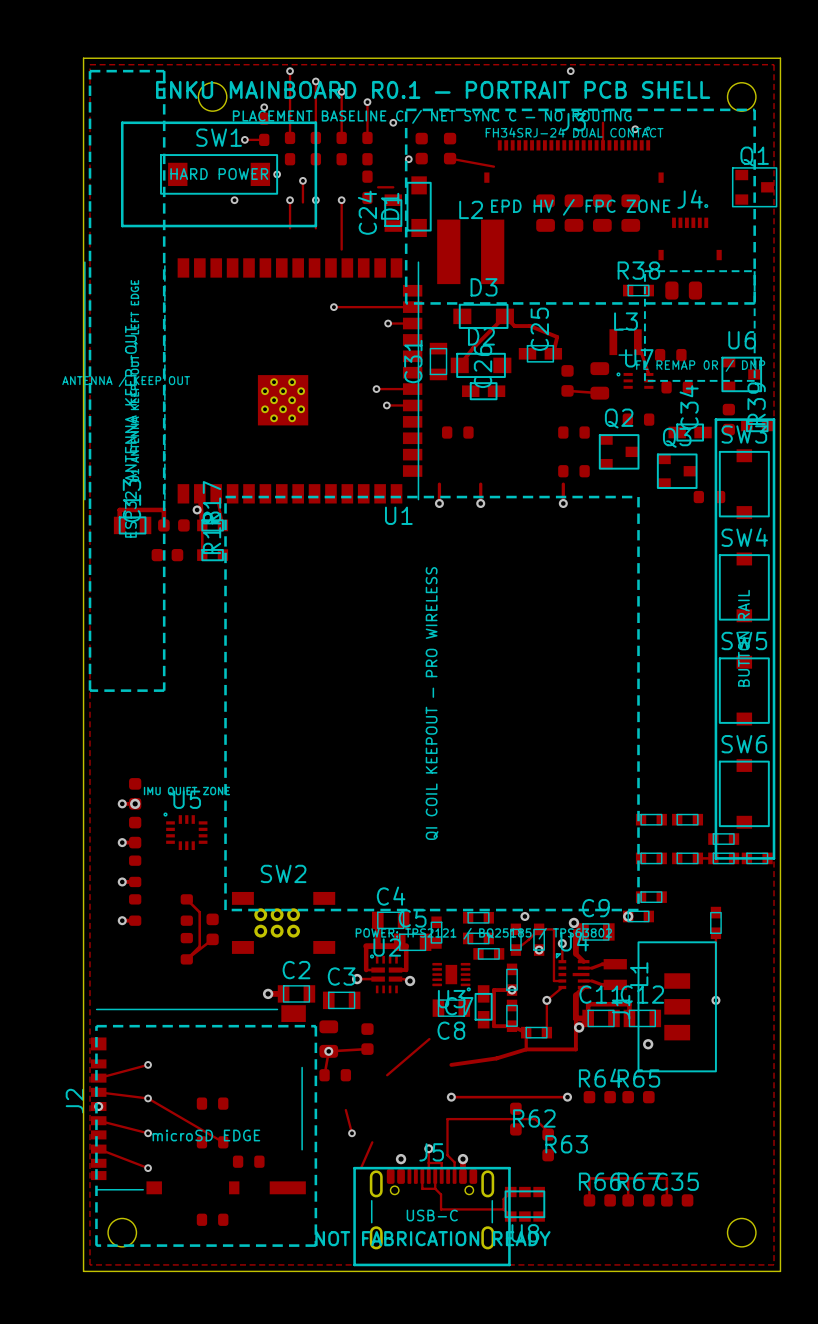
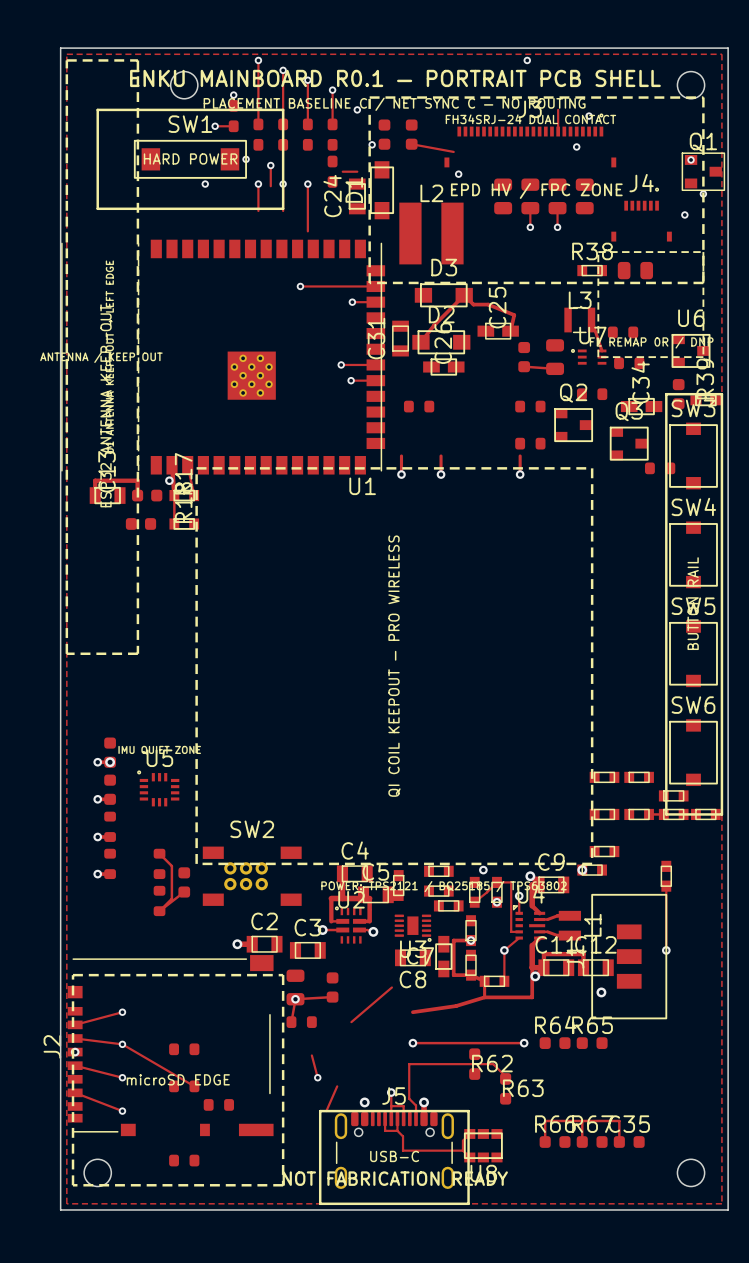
via: none -> (576, 146)
via: none -> (691, 159)
via: none -> (458, 174)
via: none -> (703, 193)
track: none -> (530, 208) (530, 227)
track: none -> (557, 208) (557, 227)
via: none -> (684, 214)
via: none -> (530, 227)
via: none -> (557, 227)

